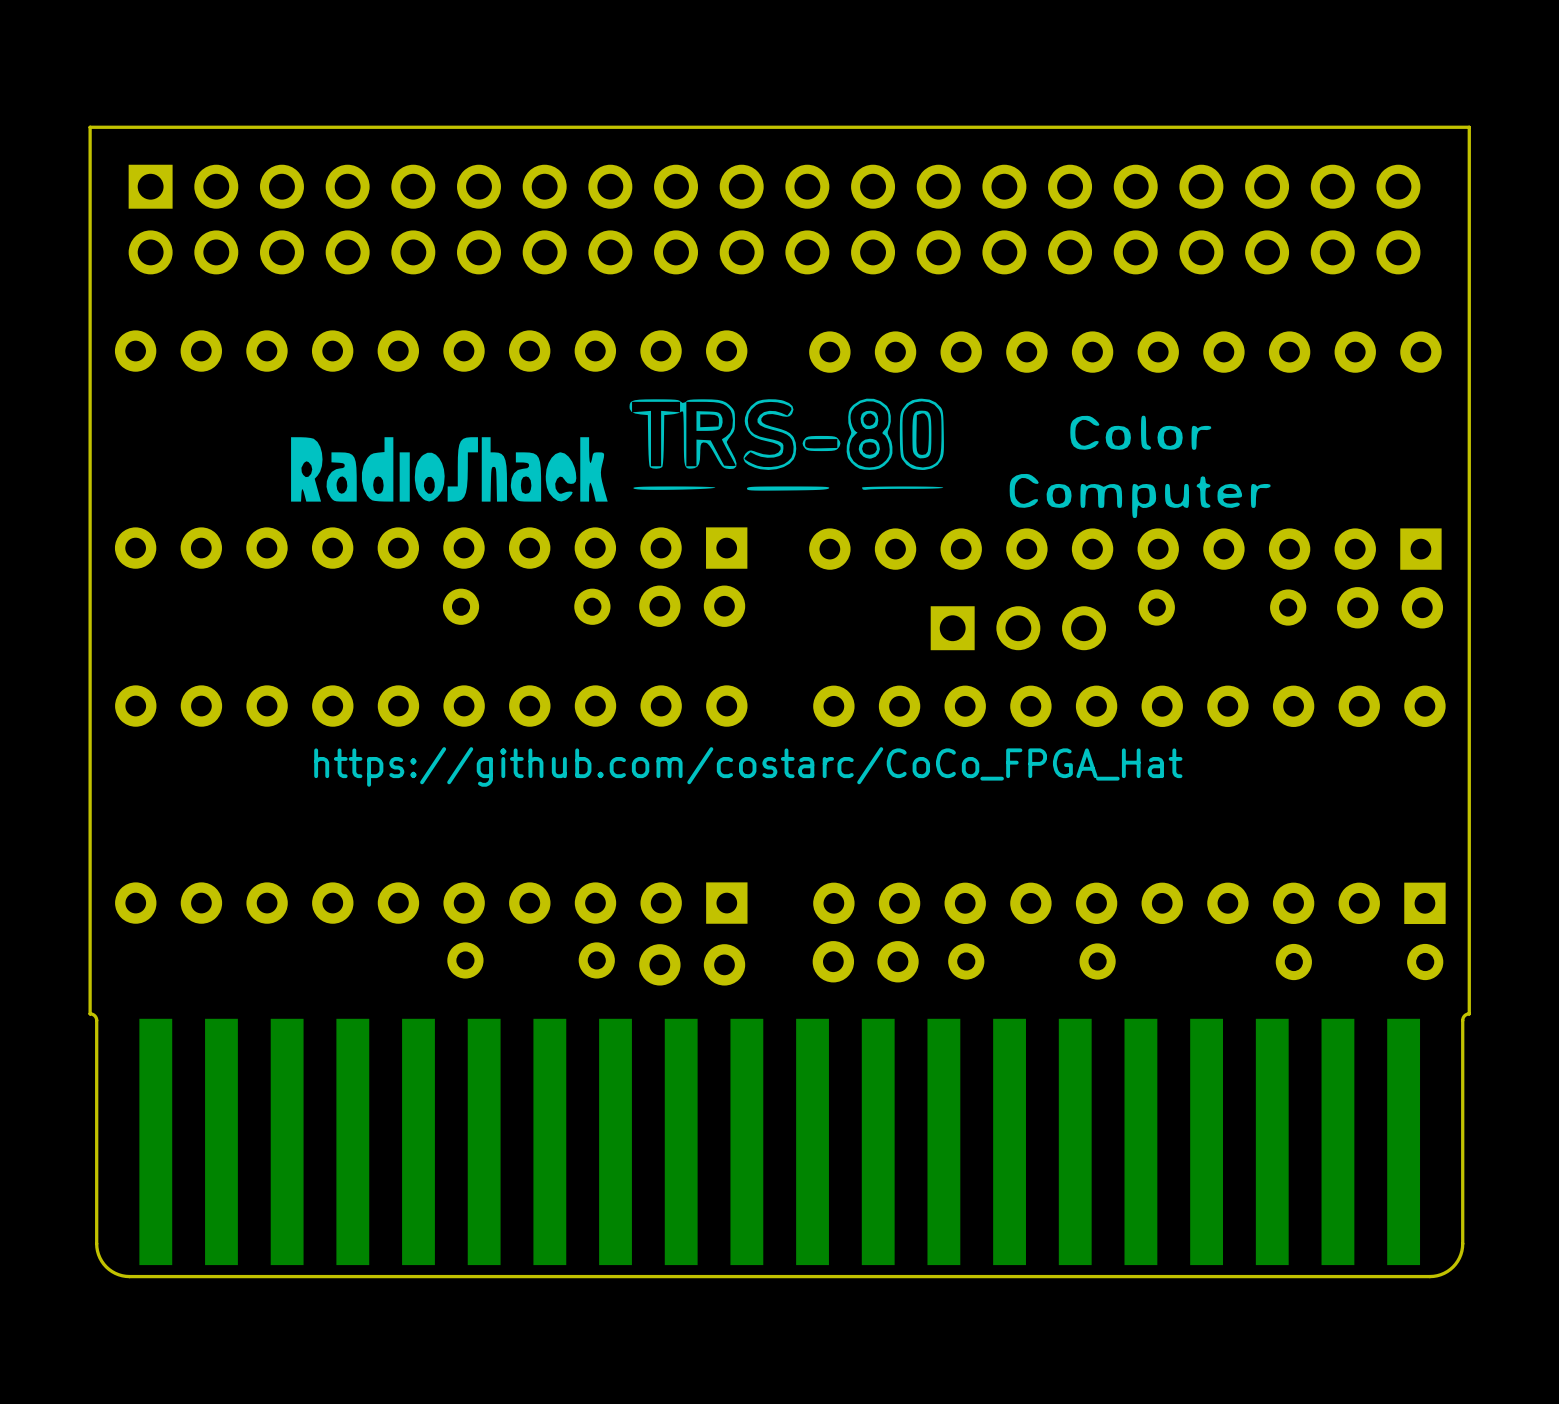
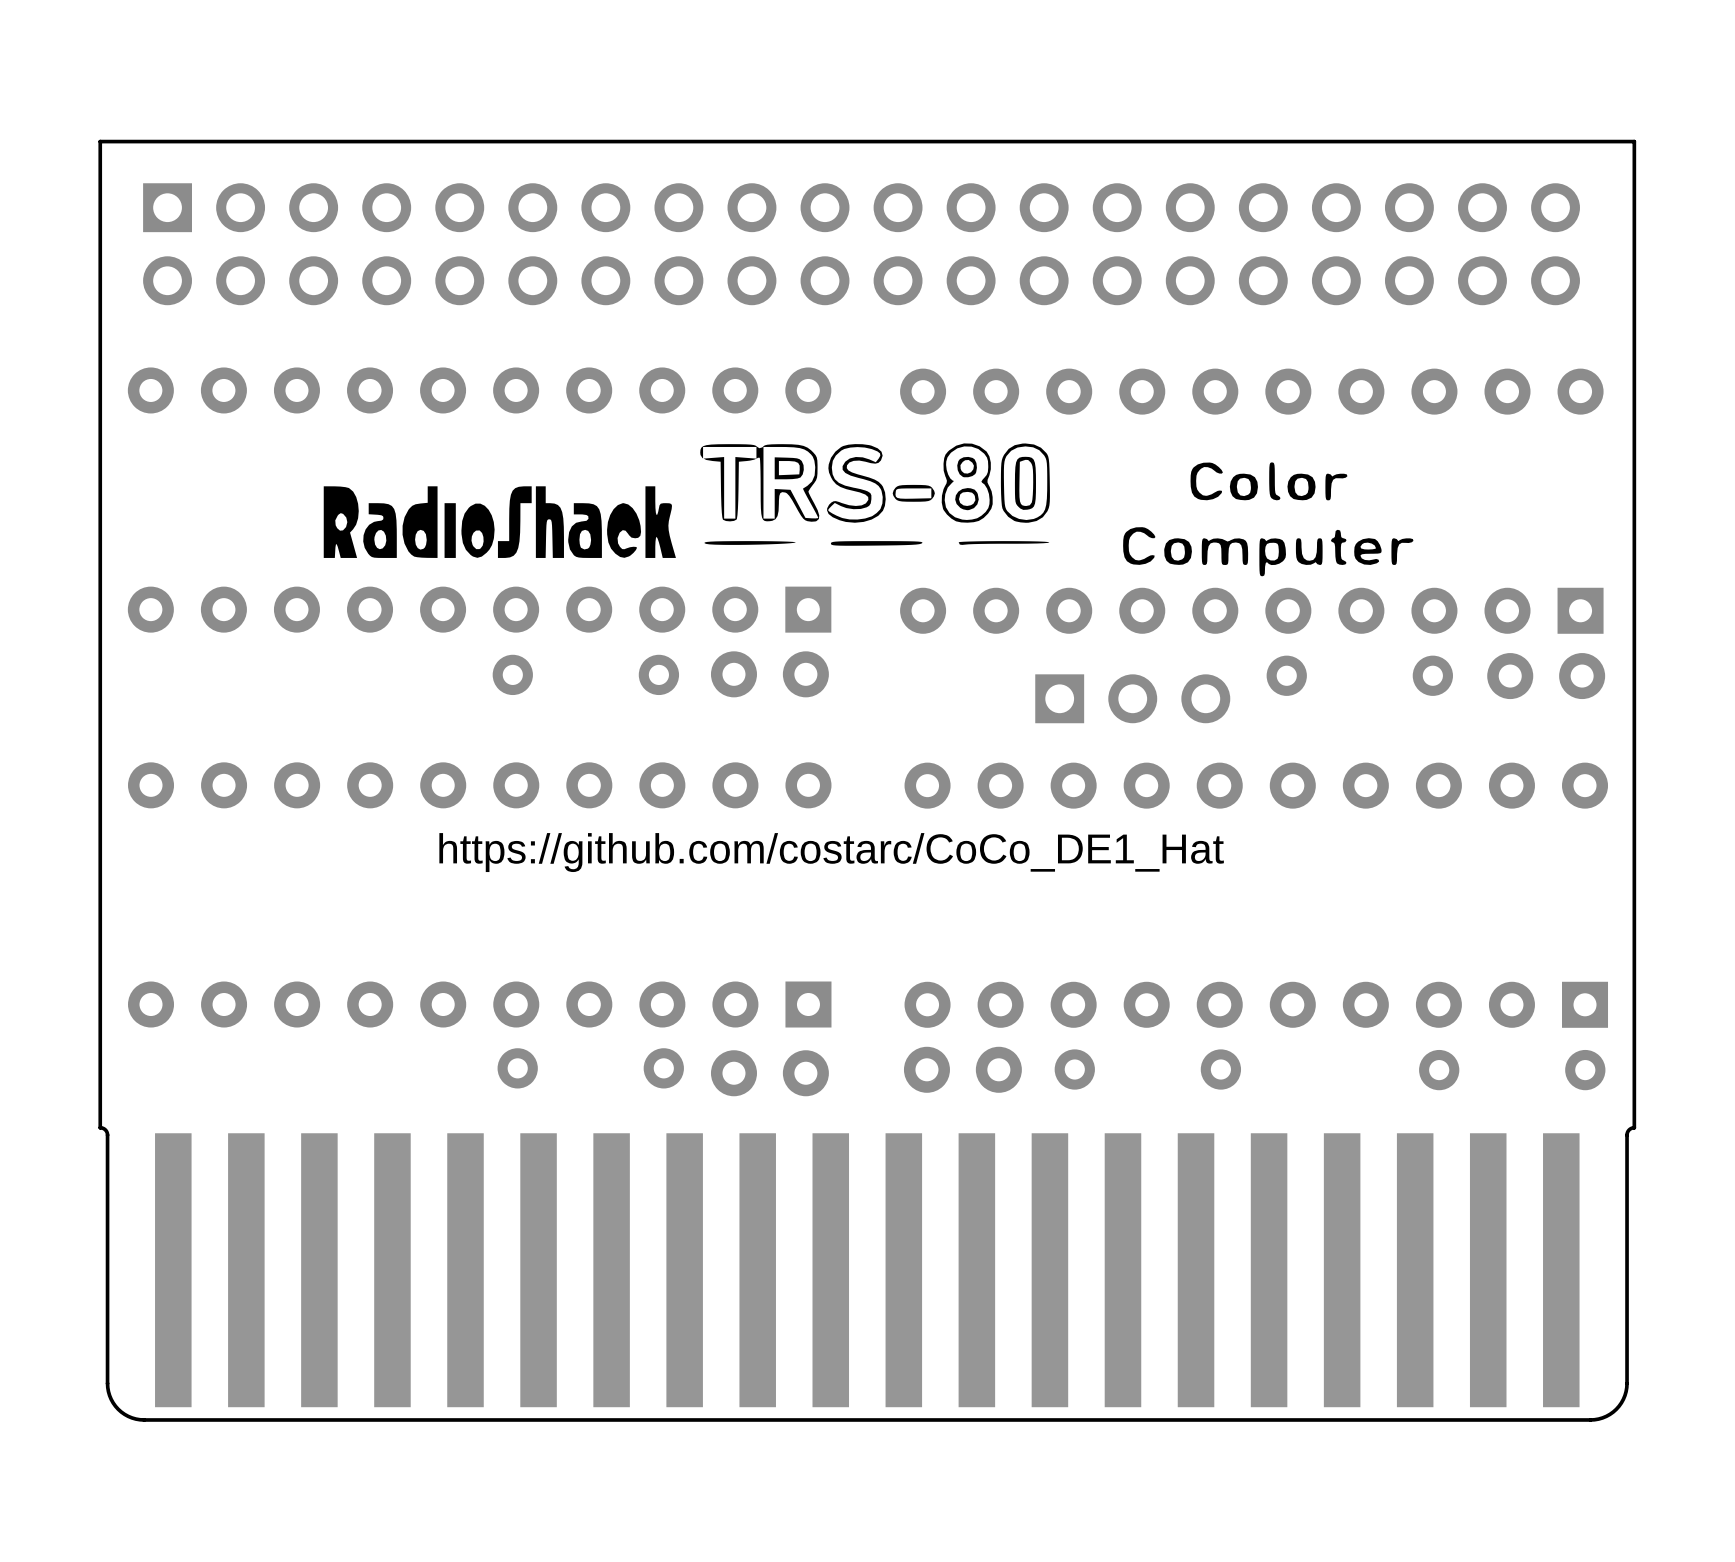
text: https://github.com/costarc/CoCo_FPGA_Hat (748, 766) -> https://github.com/costarc/CoCo_DE1_Hat (831, 852)

